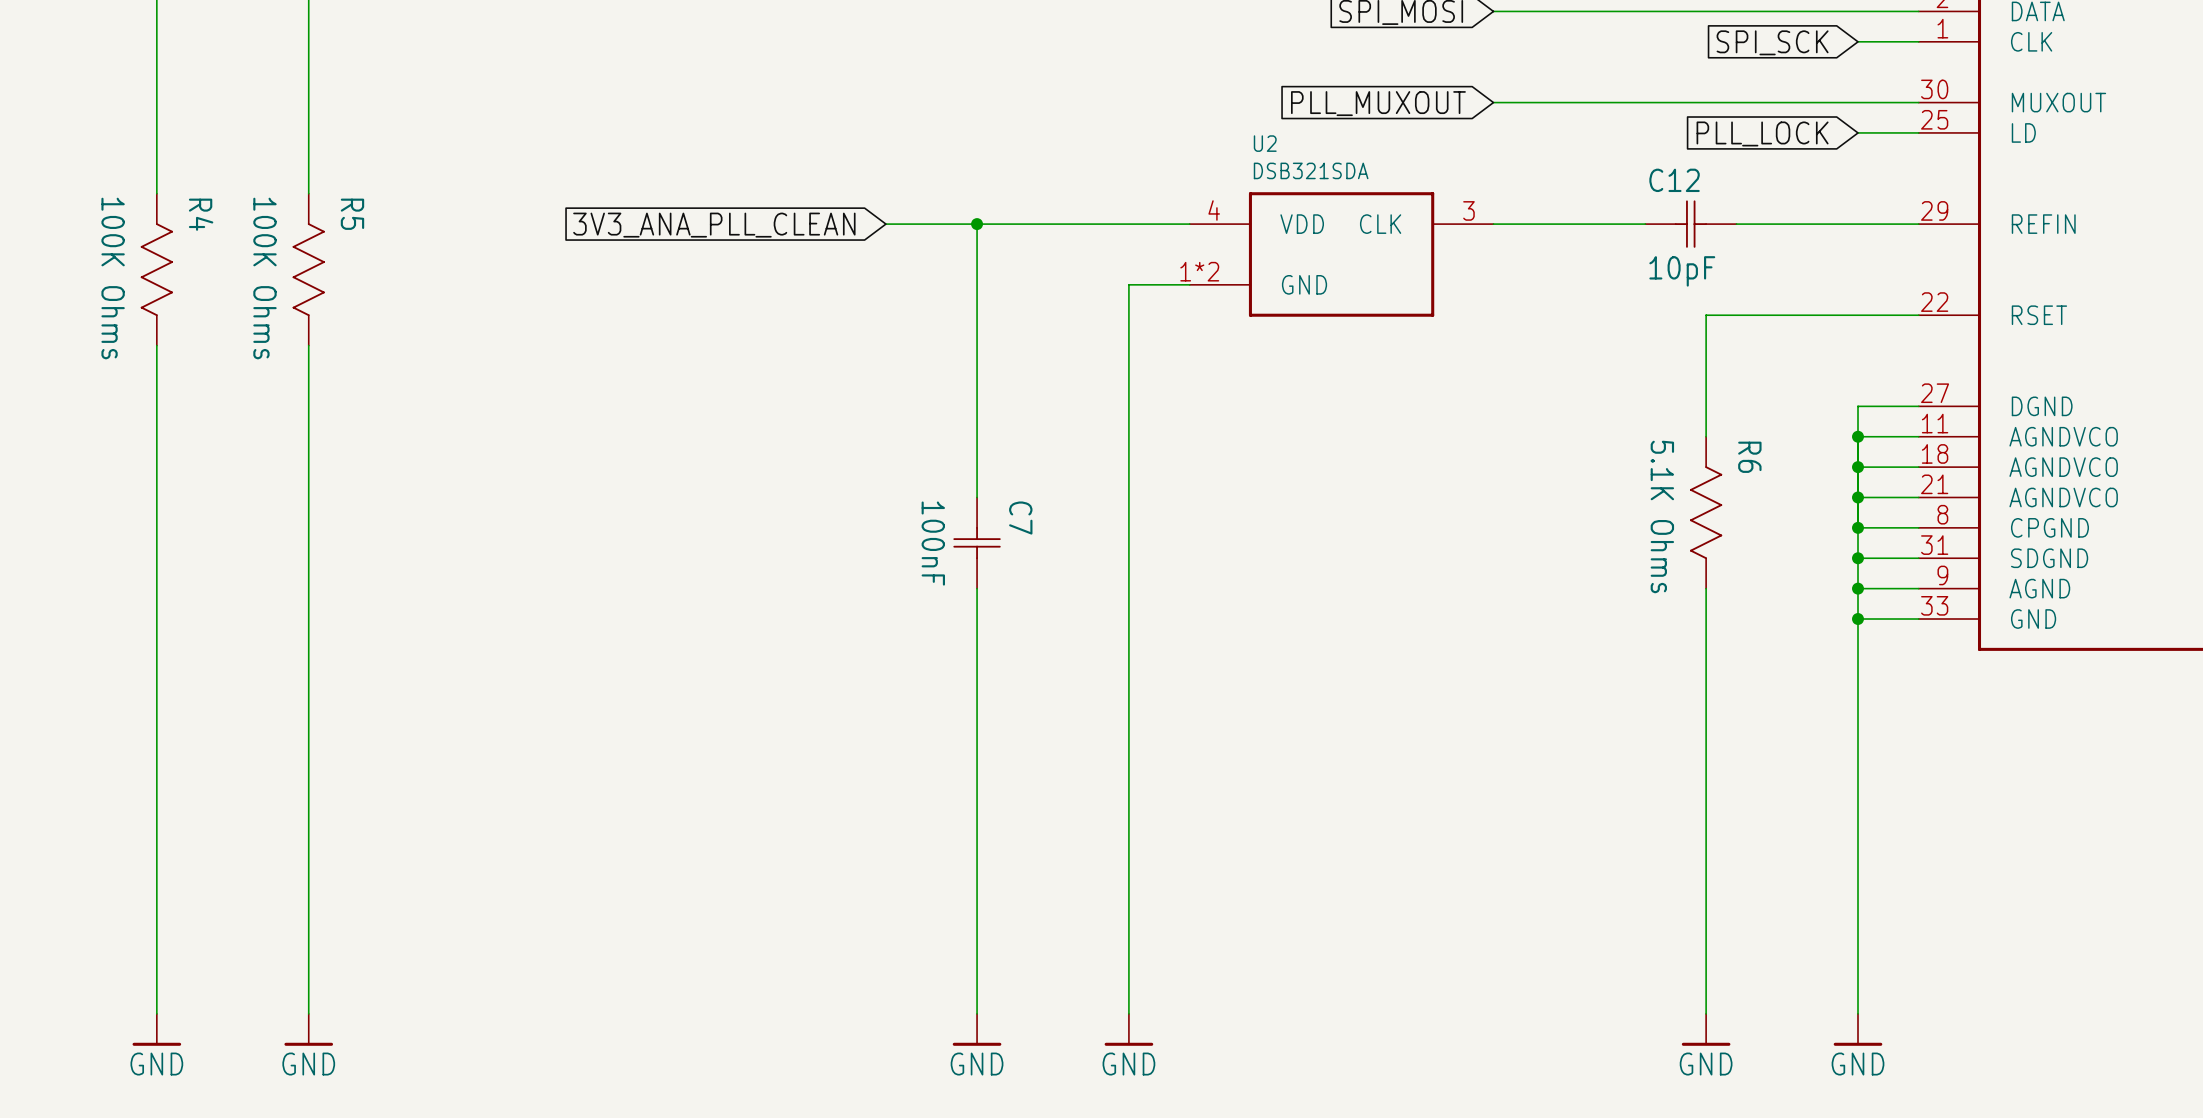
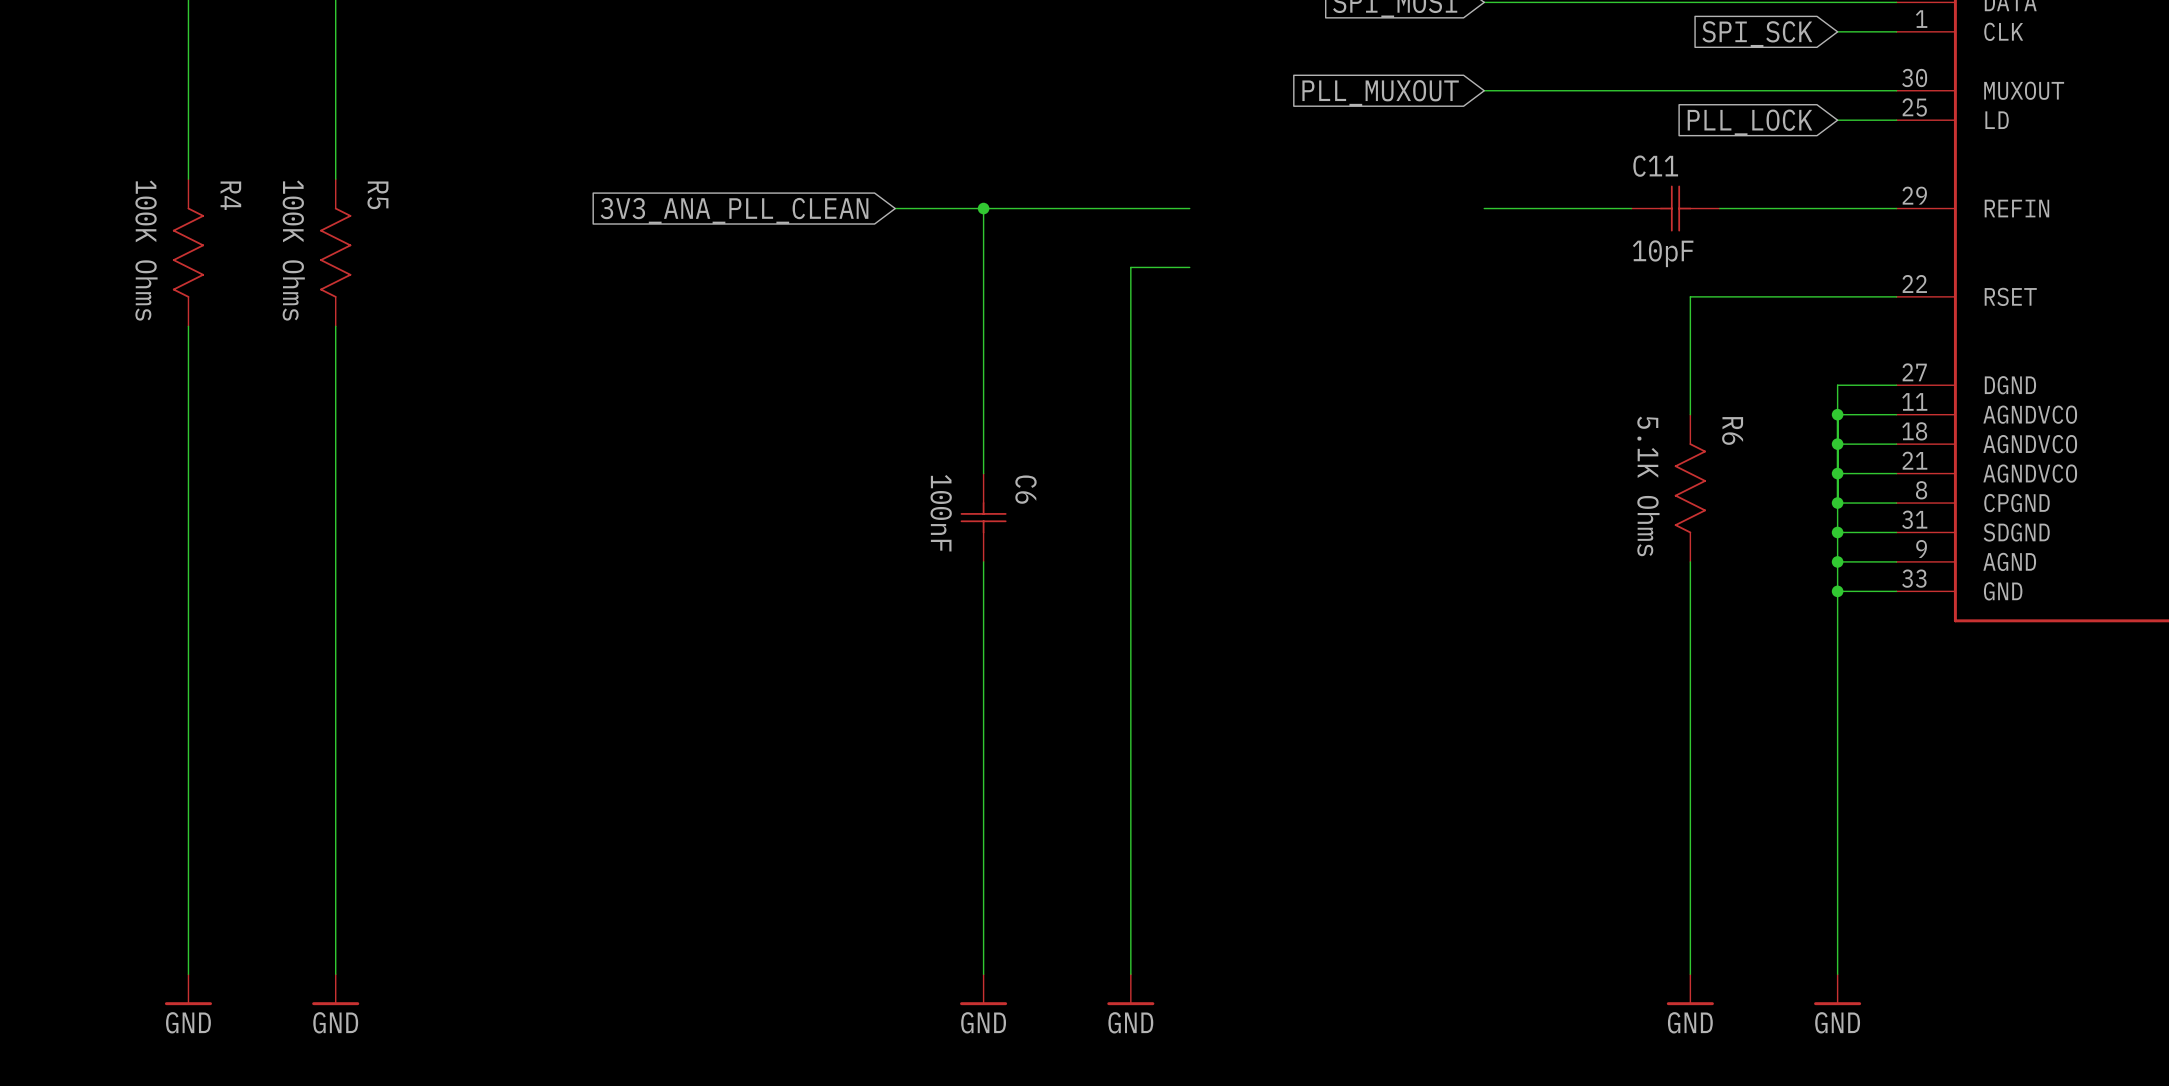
C12 name: C12 (1674, 180) -> C11 (1655, 166)
U2: DSB321SDA (1341, 254) -> none
C7 name: C7 (1020, 518) -> C6 (1025, 489)

